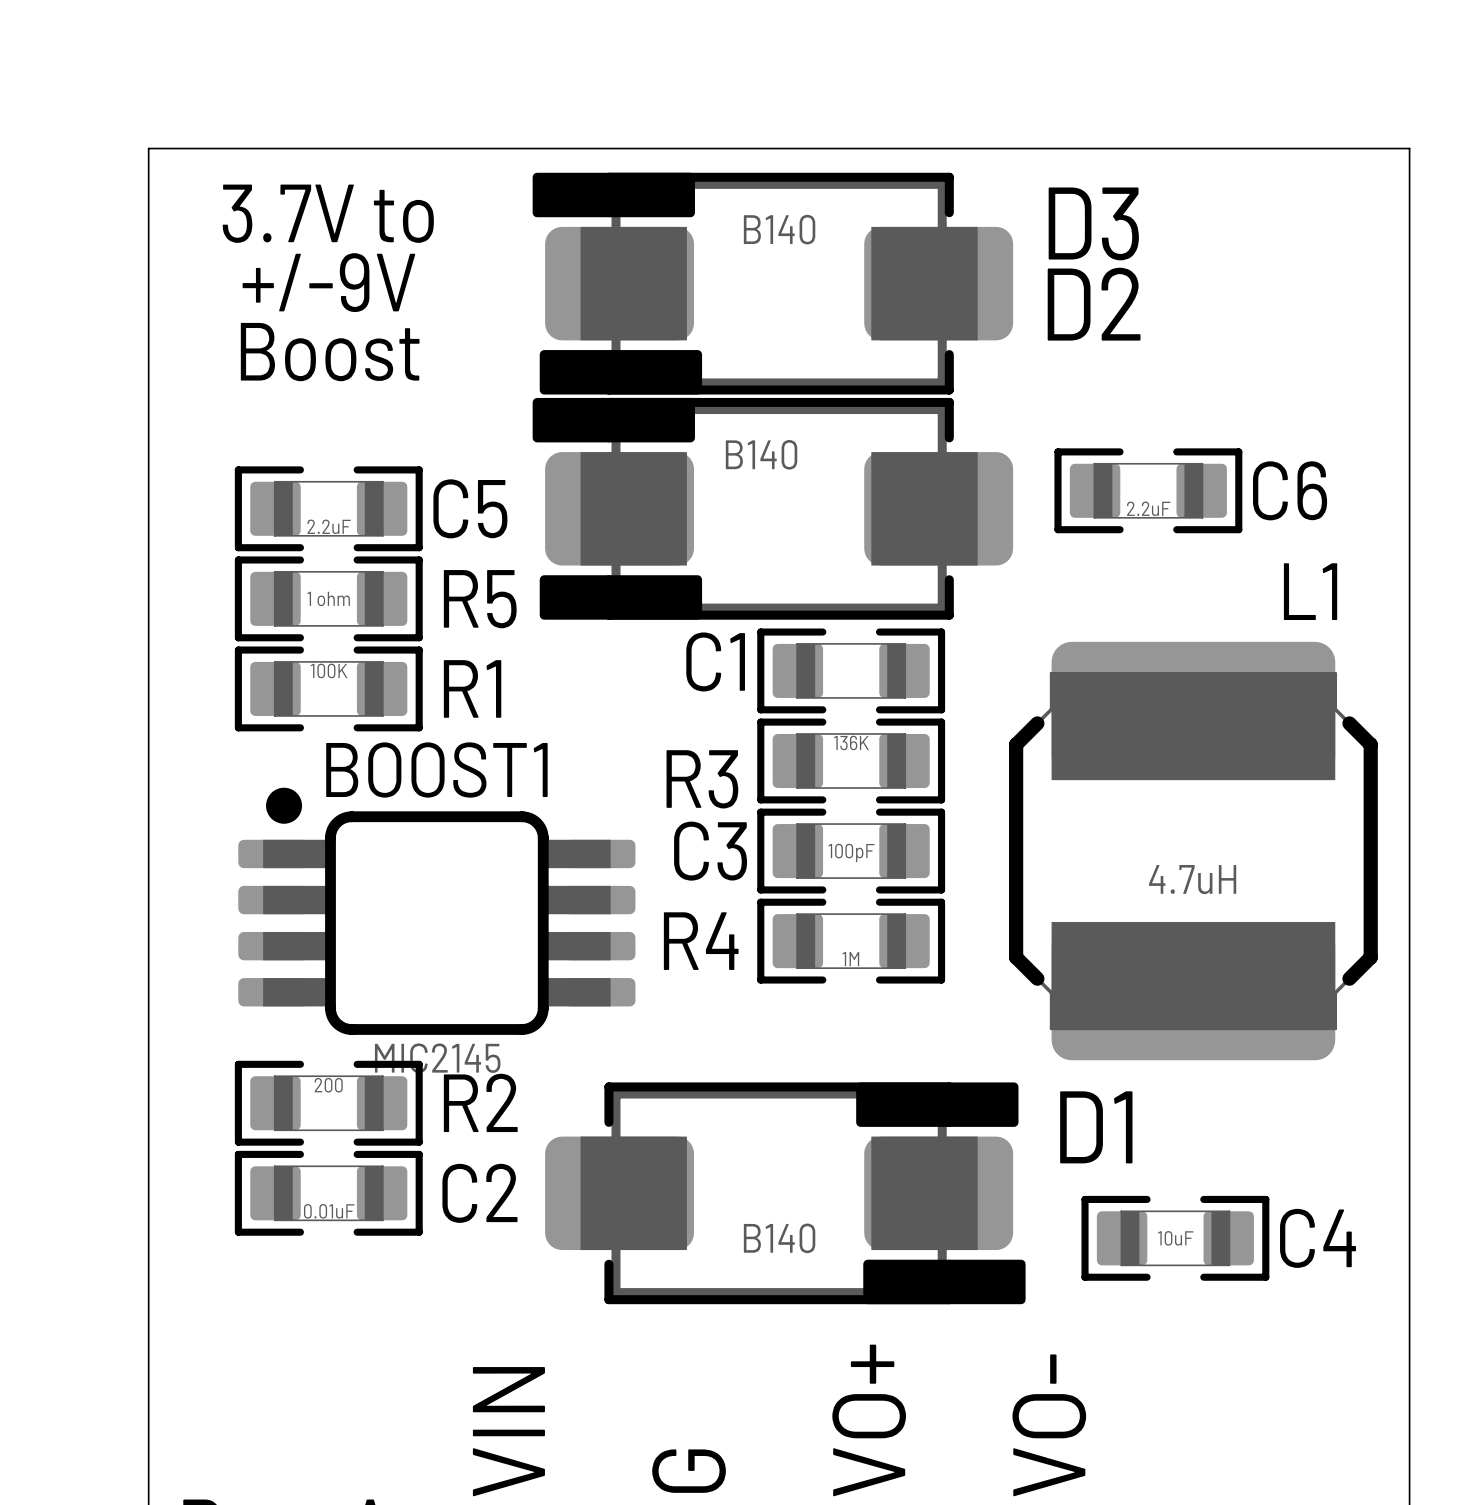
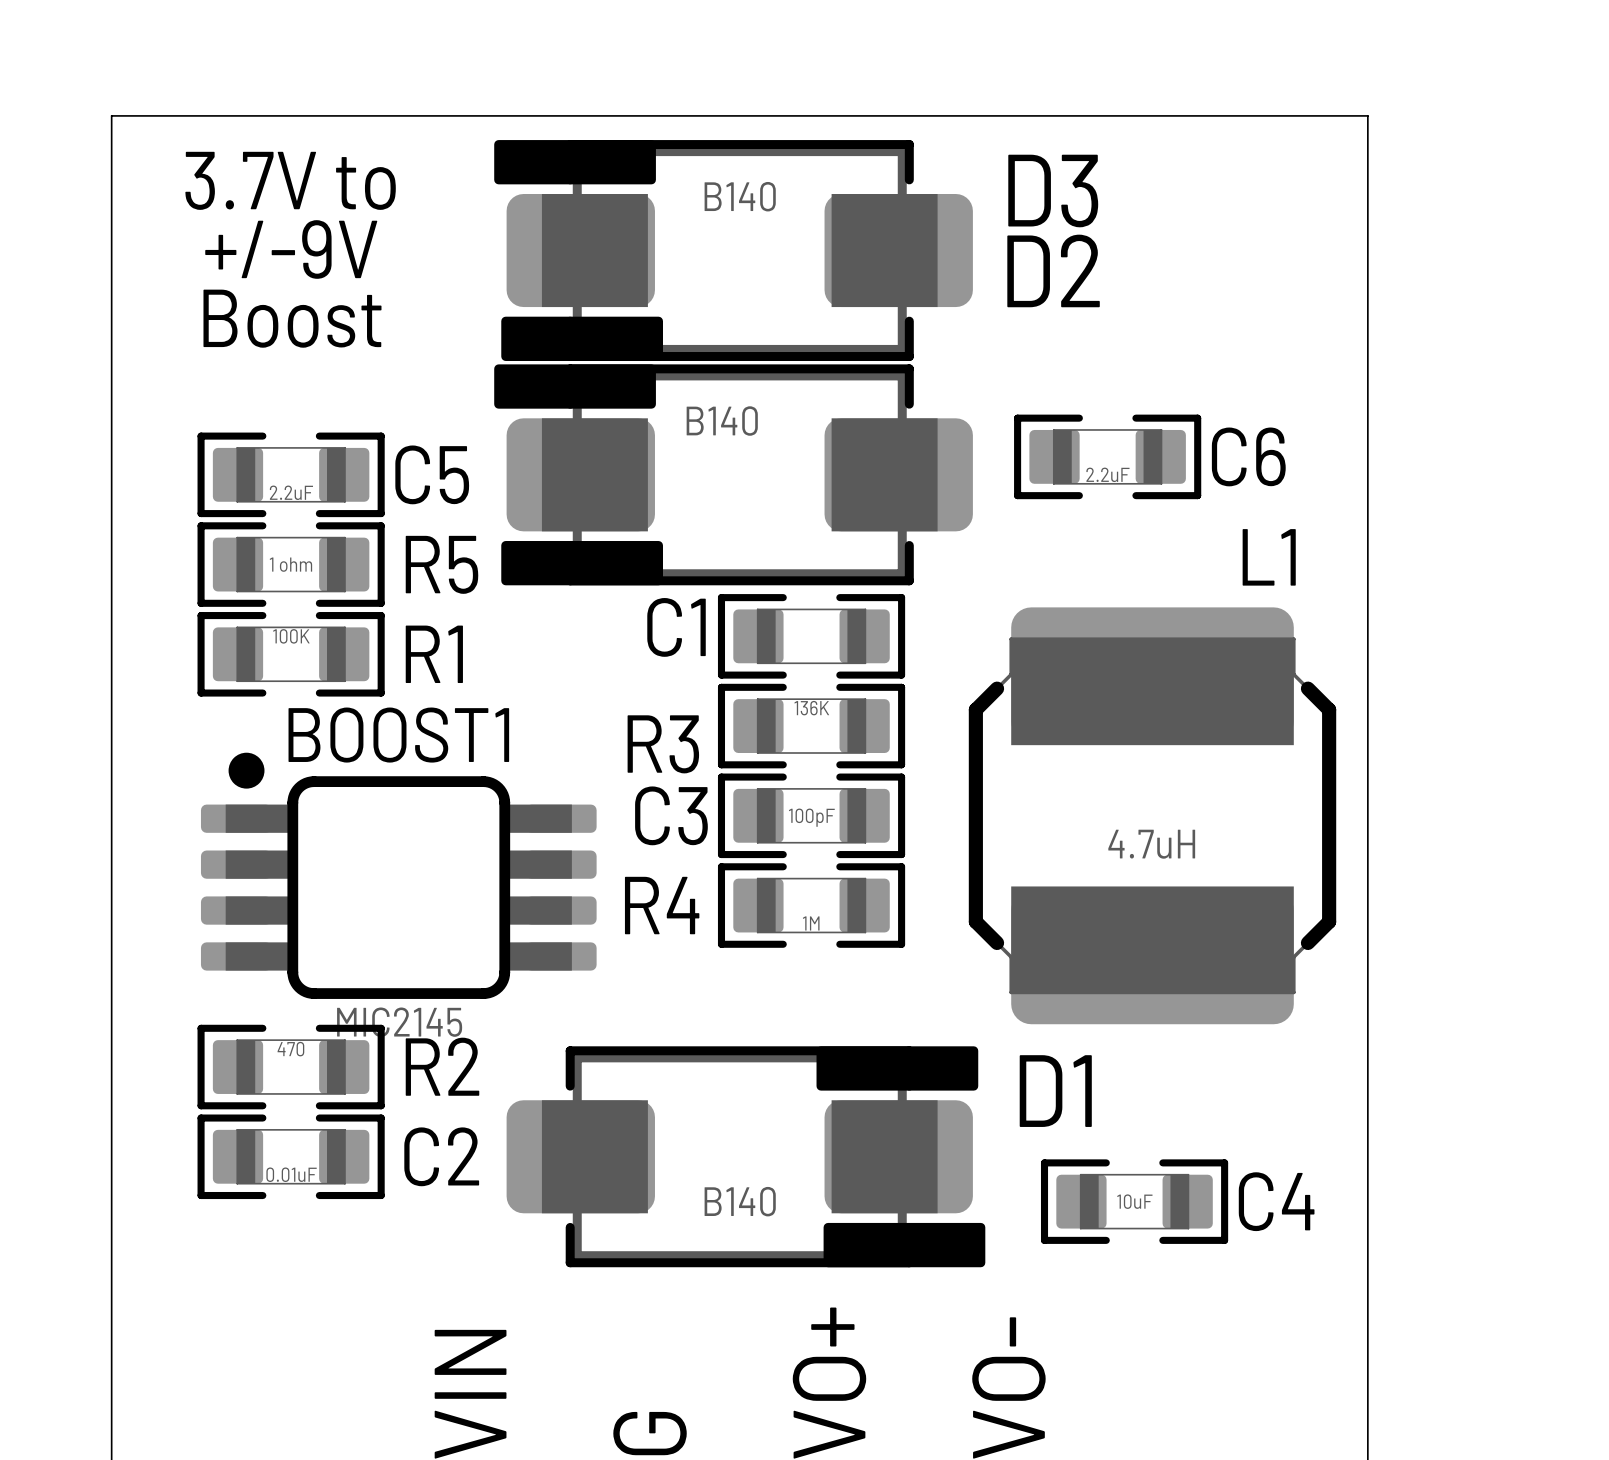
R2 value: 200 (328, 1085) -> 470 (290, 1049)

